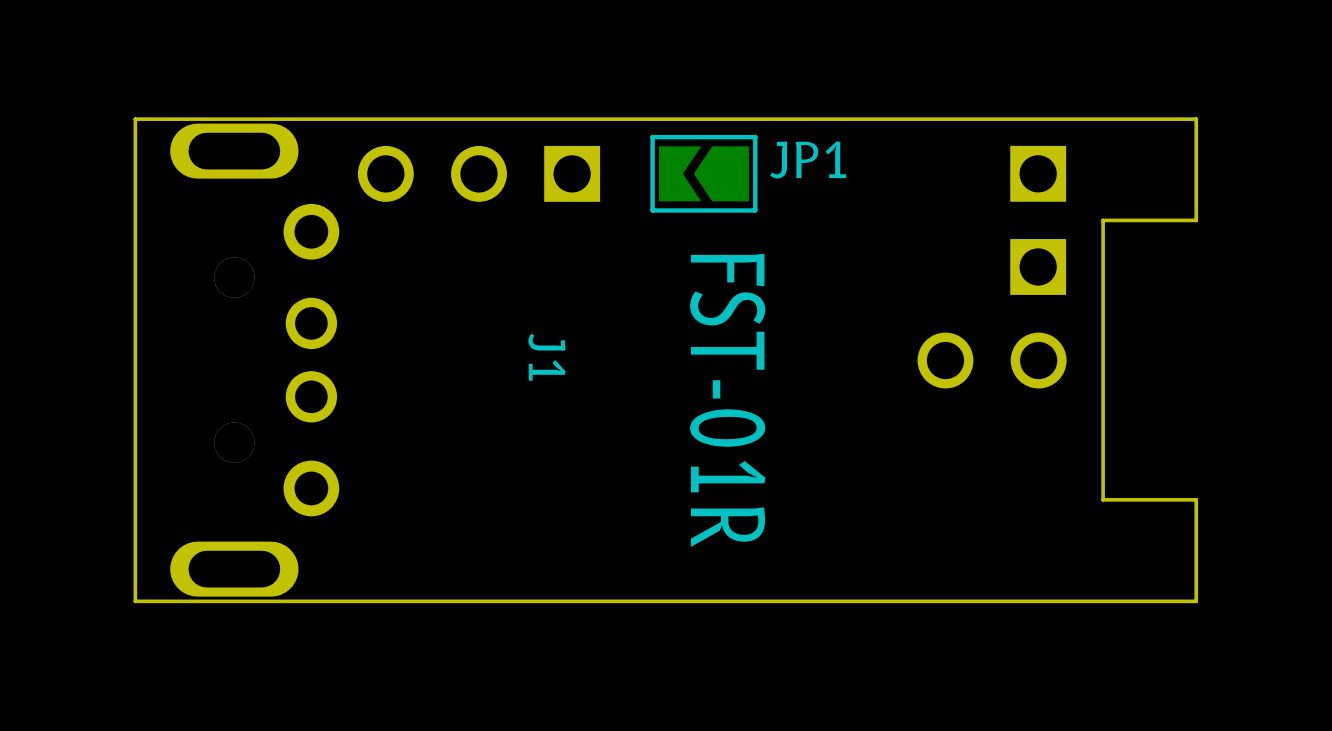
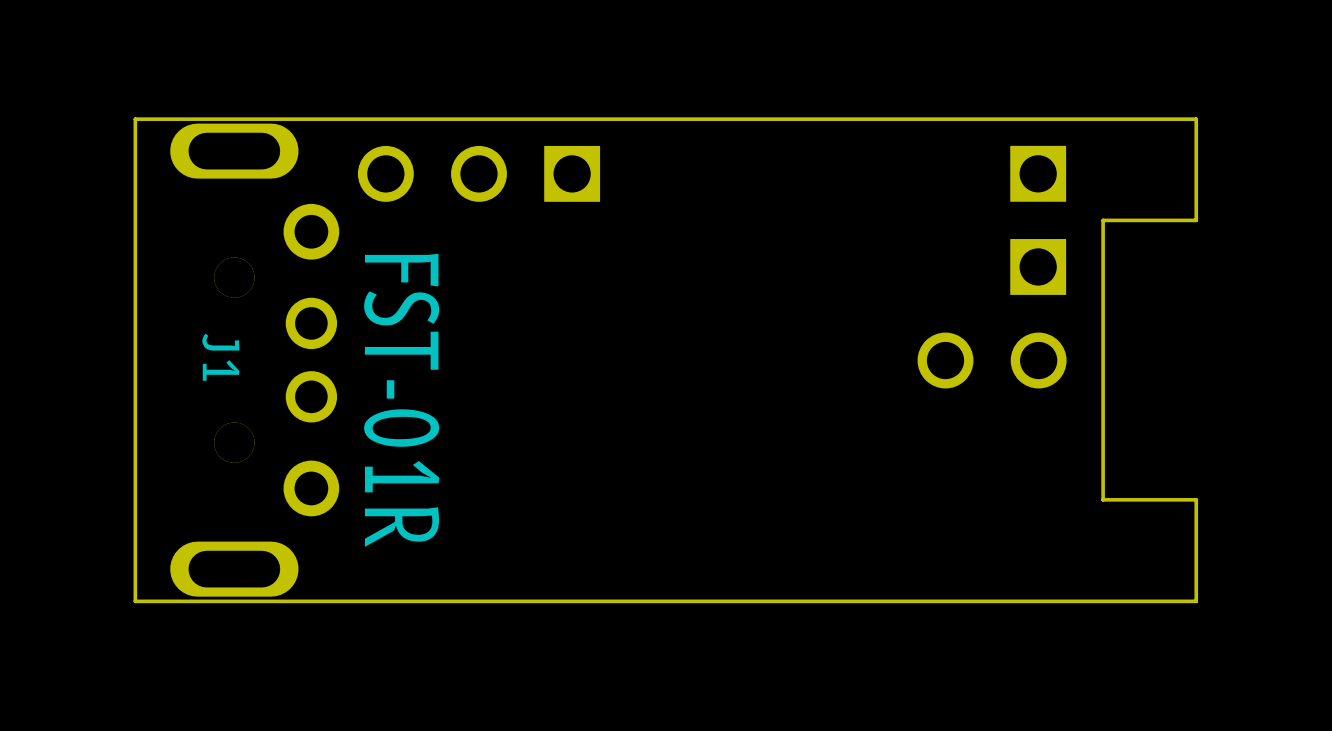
JP1: (703, 173) -> none
text position: J1 (546, 357) -> J1 (220, 357)
text position: FST-01R (727, 400) -> FST-01R (401, 400)

